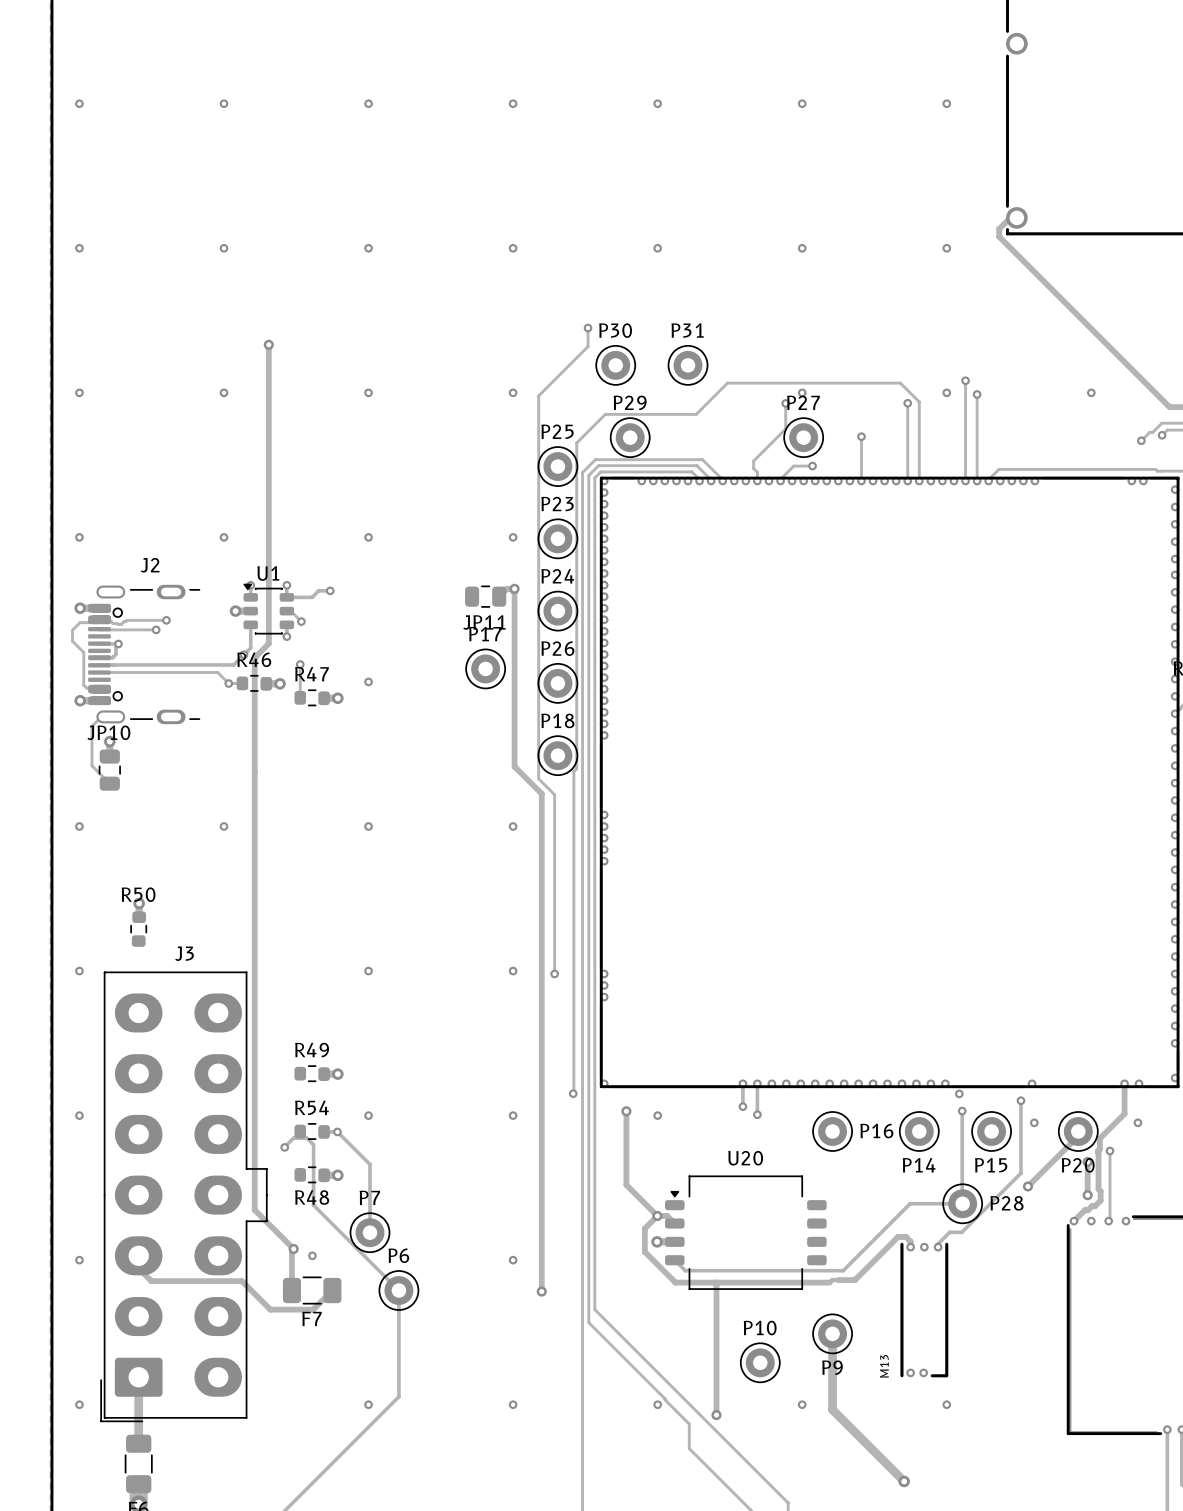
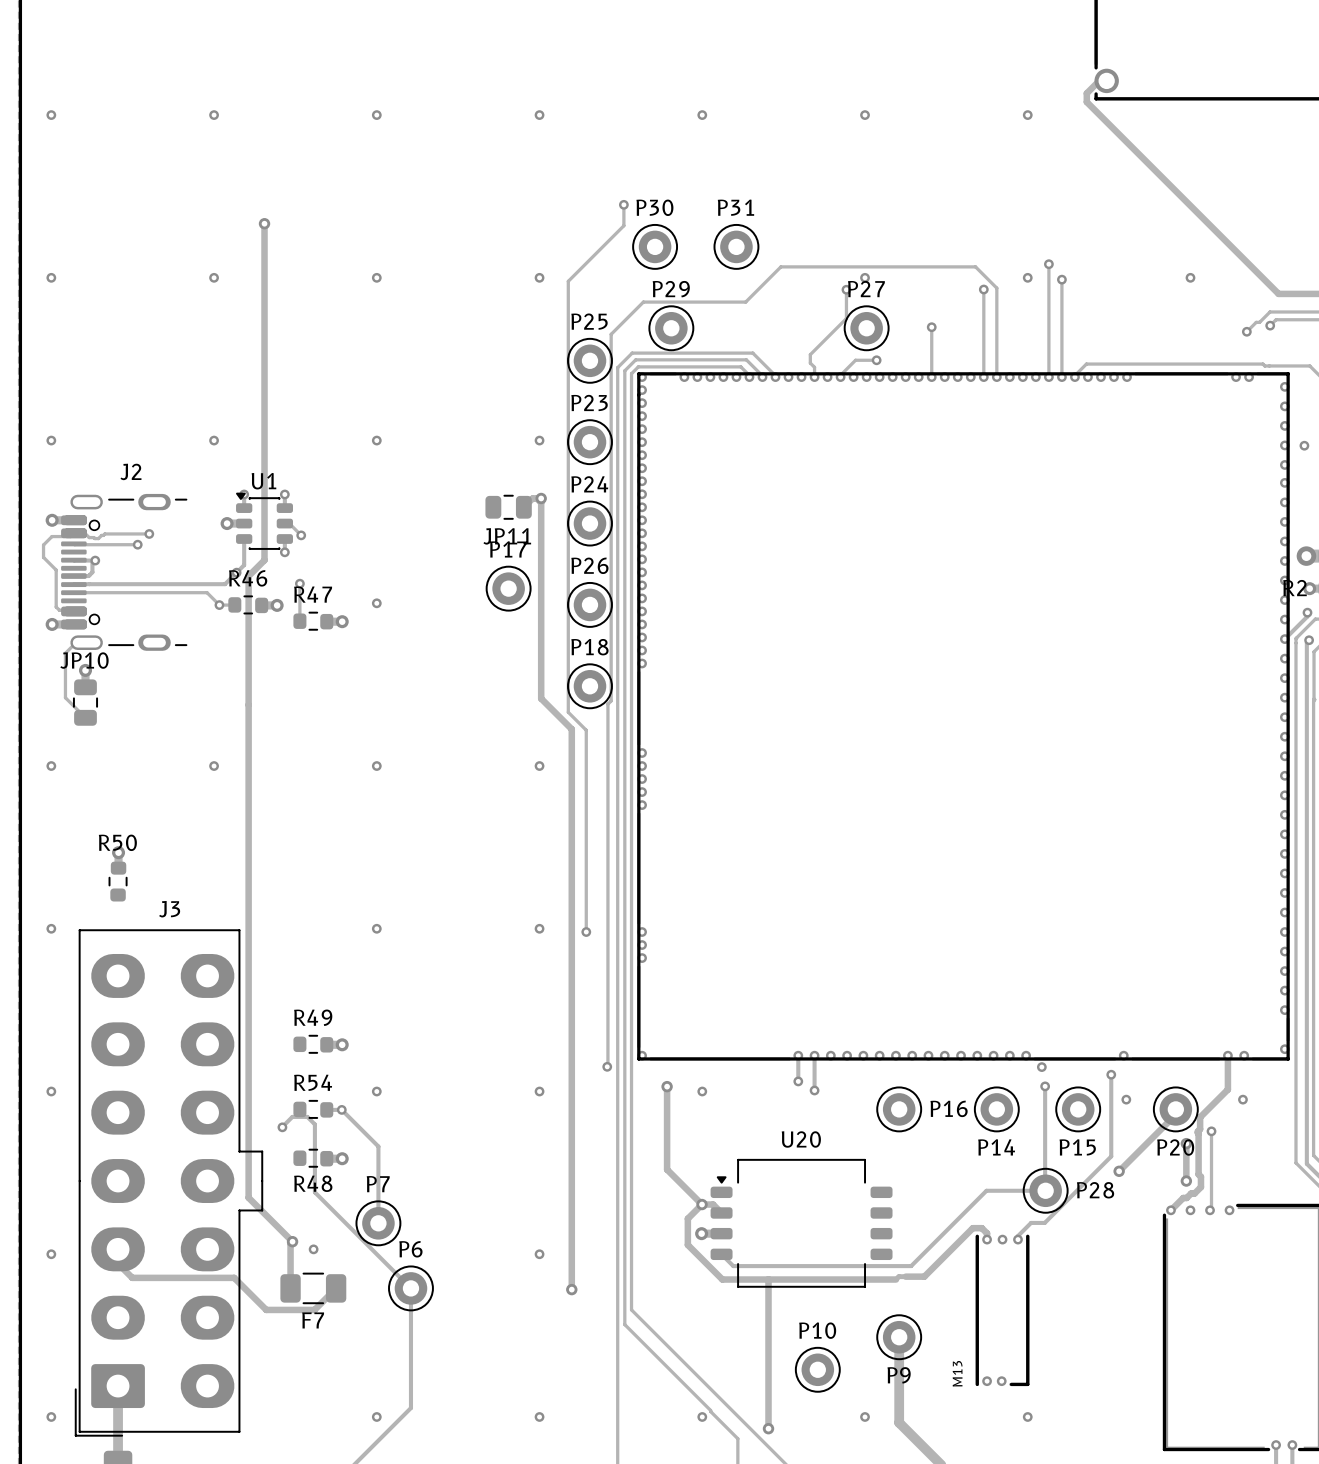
track: (330, 590) (318, 590) (312, 597) (286, 597) -> none
via: (330, 590) -> none

